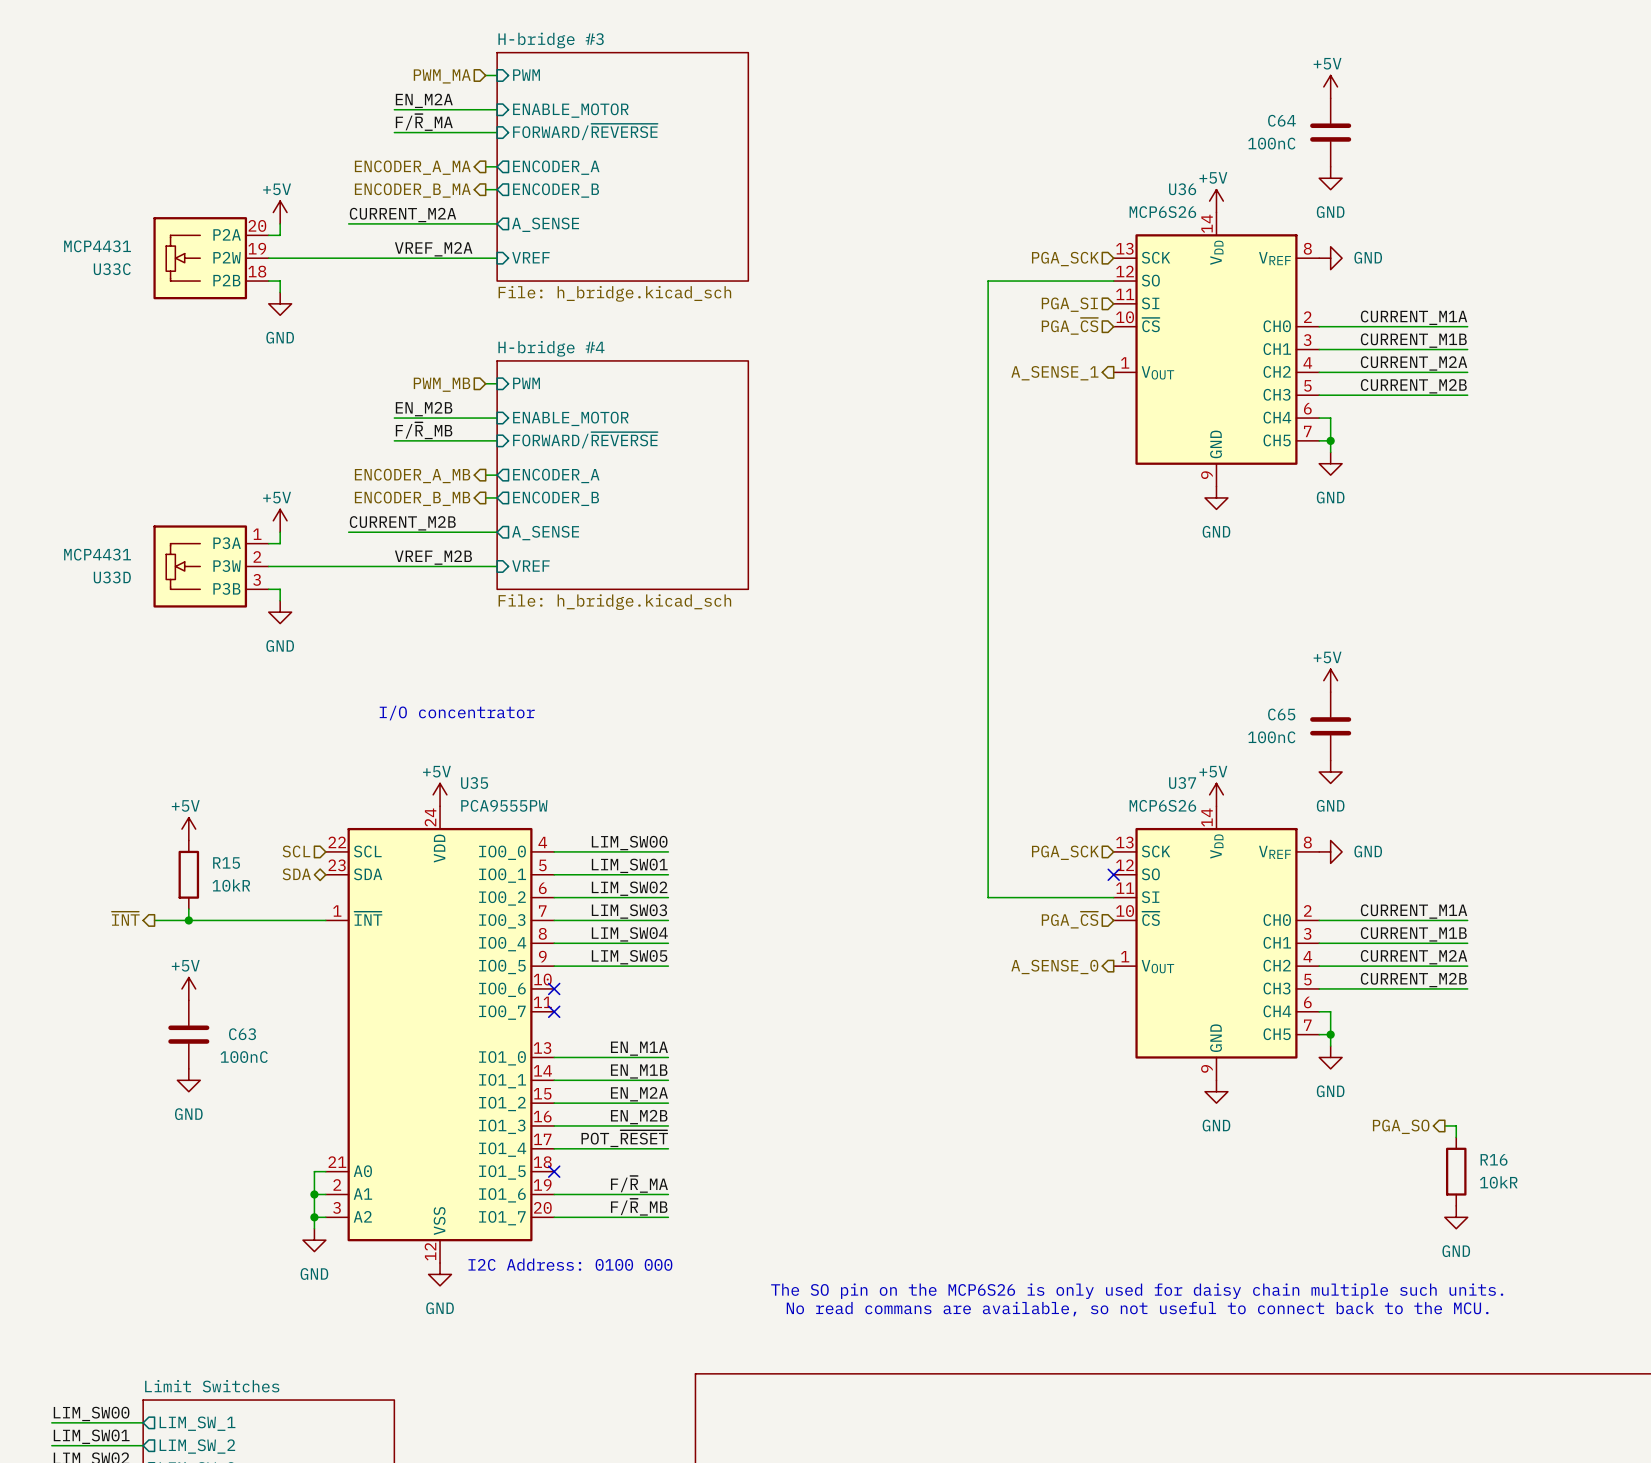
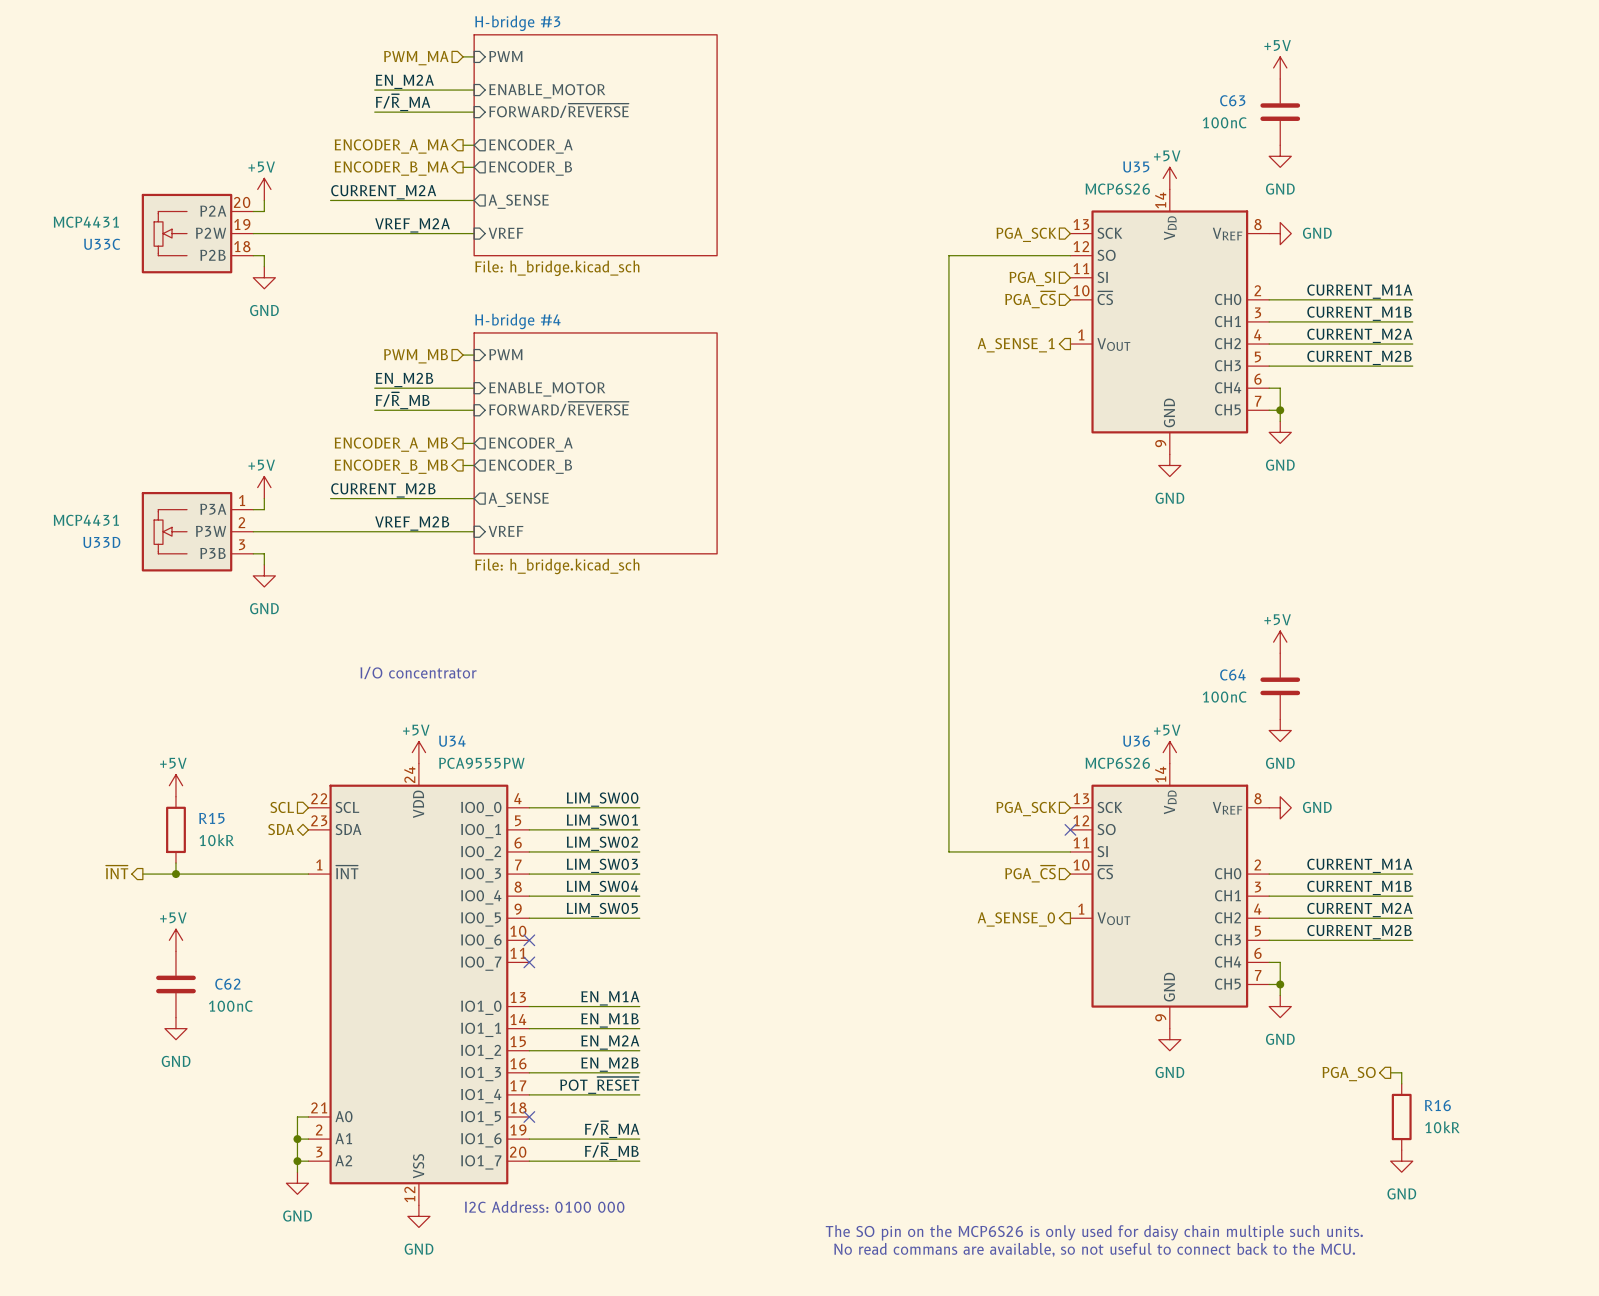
C64 name: C64 (1281, 120) -> C63 (1232, 100)
U36 name: U36 (1182, 189) -> U35 (1136, 166)
C65 name: C65 (1281, 714) -> C64 (1232, 674)
U35 name: U35 (474, 783) -> U34 (452, 741)
U37 name: U37 (1182, 783) -> U36 (1136, 741)
C63 name: C63 (242, 1034) -> C62 (227, 984)

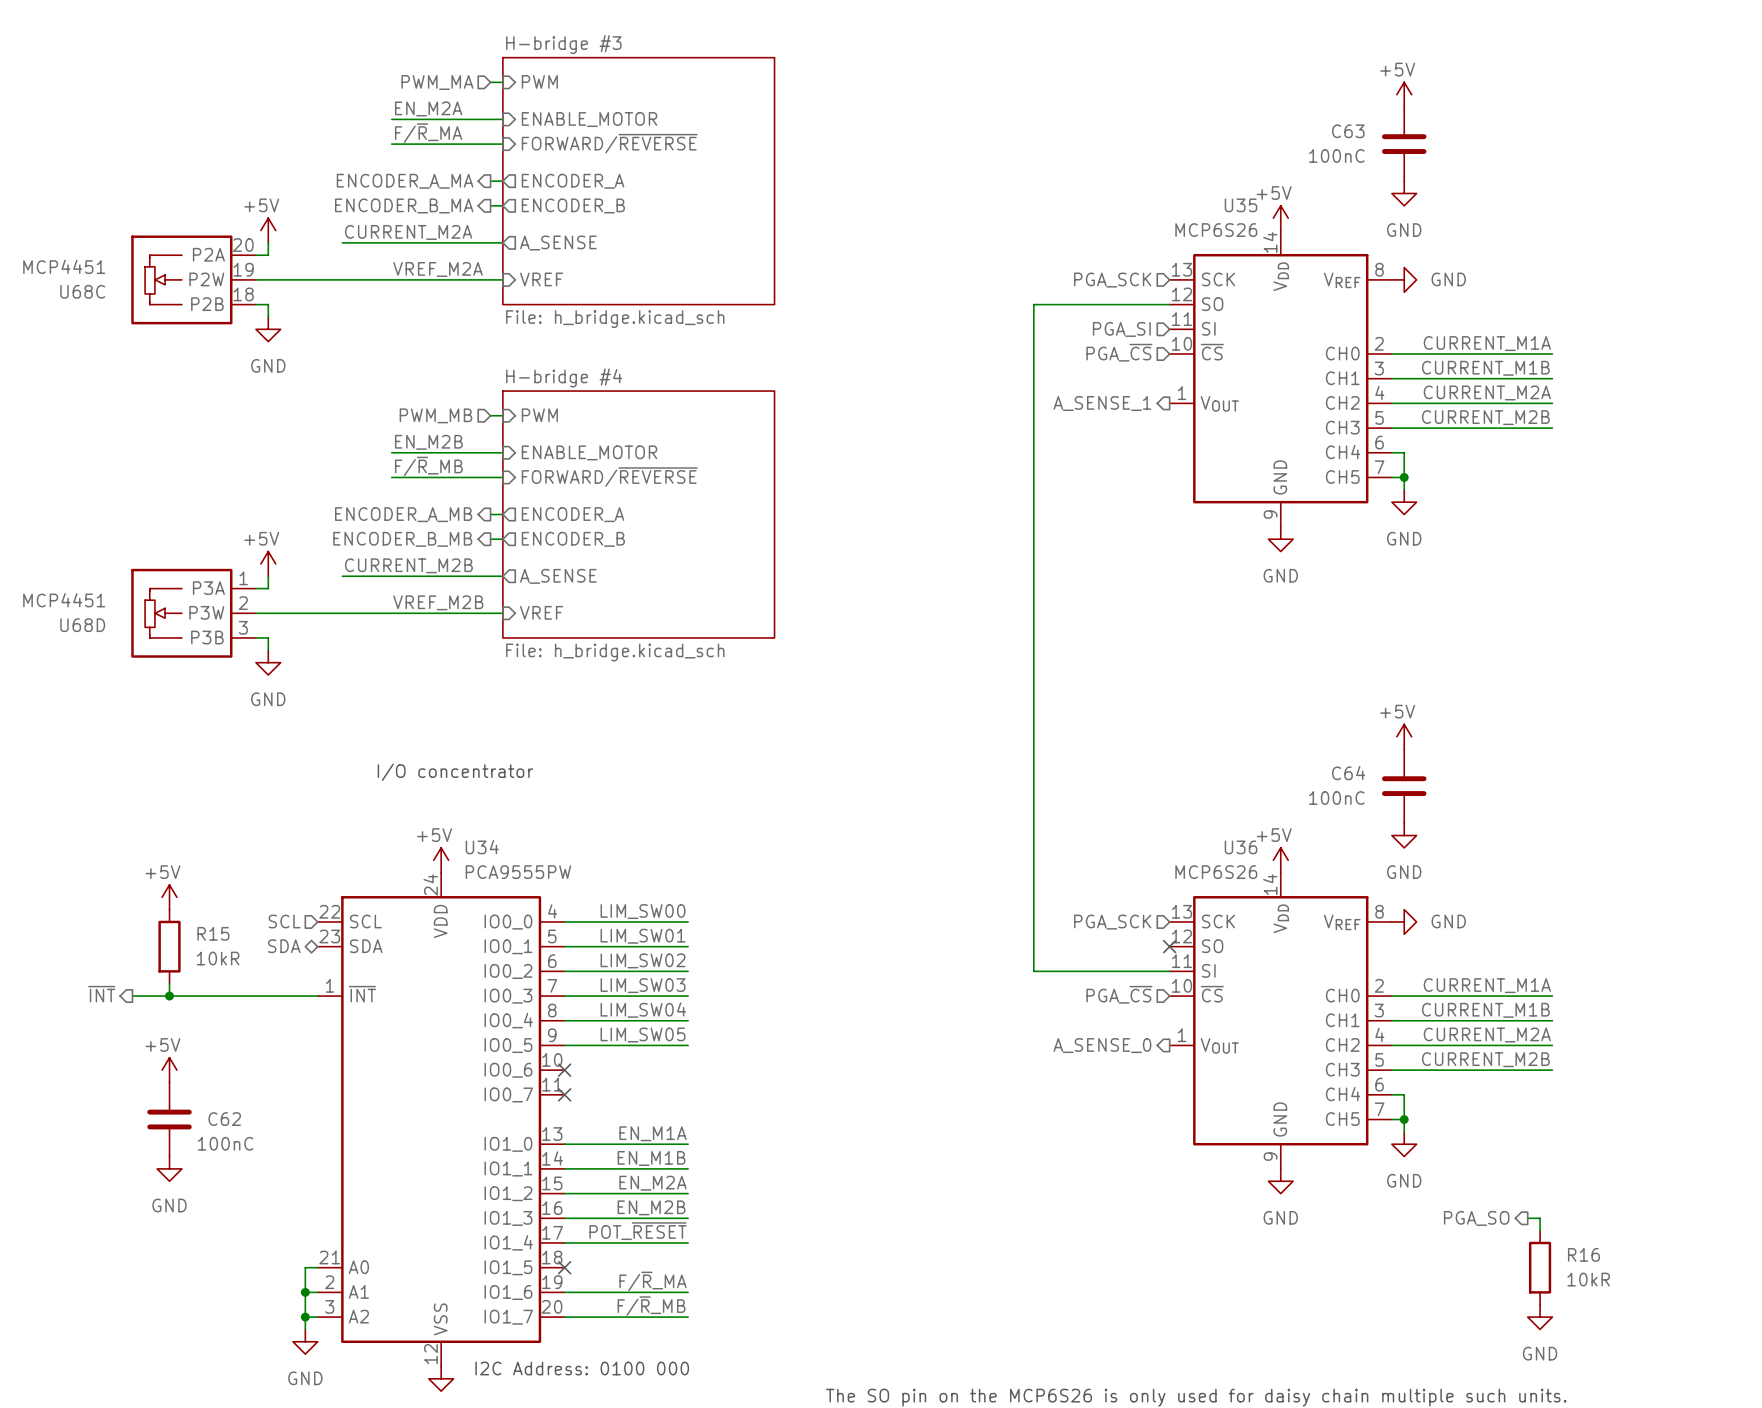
U33C value: MCP4431 (86, 222) -> MCP4451 (64, 266)
U33C name: U33C (102, 244) -> U68C (82, 291)
U33D value: MCP4431 (86, 520) -> MCP4451 (64, 600)
U33D name: U33D (101, 542) -> U68D (82, 625)

